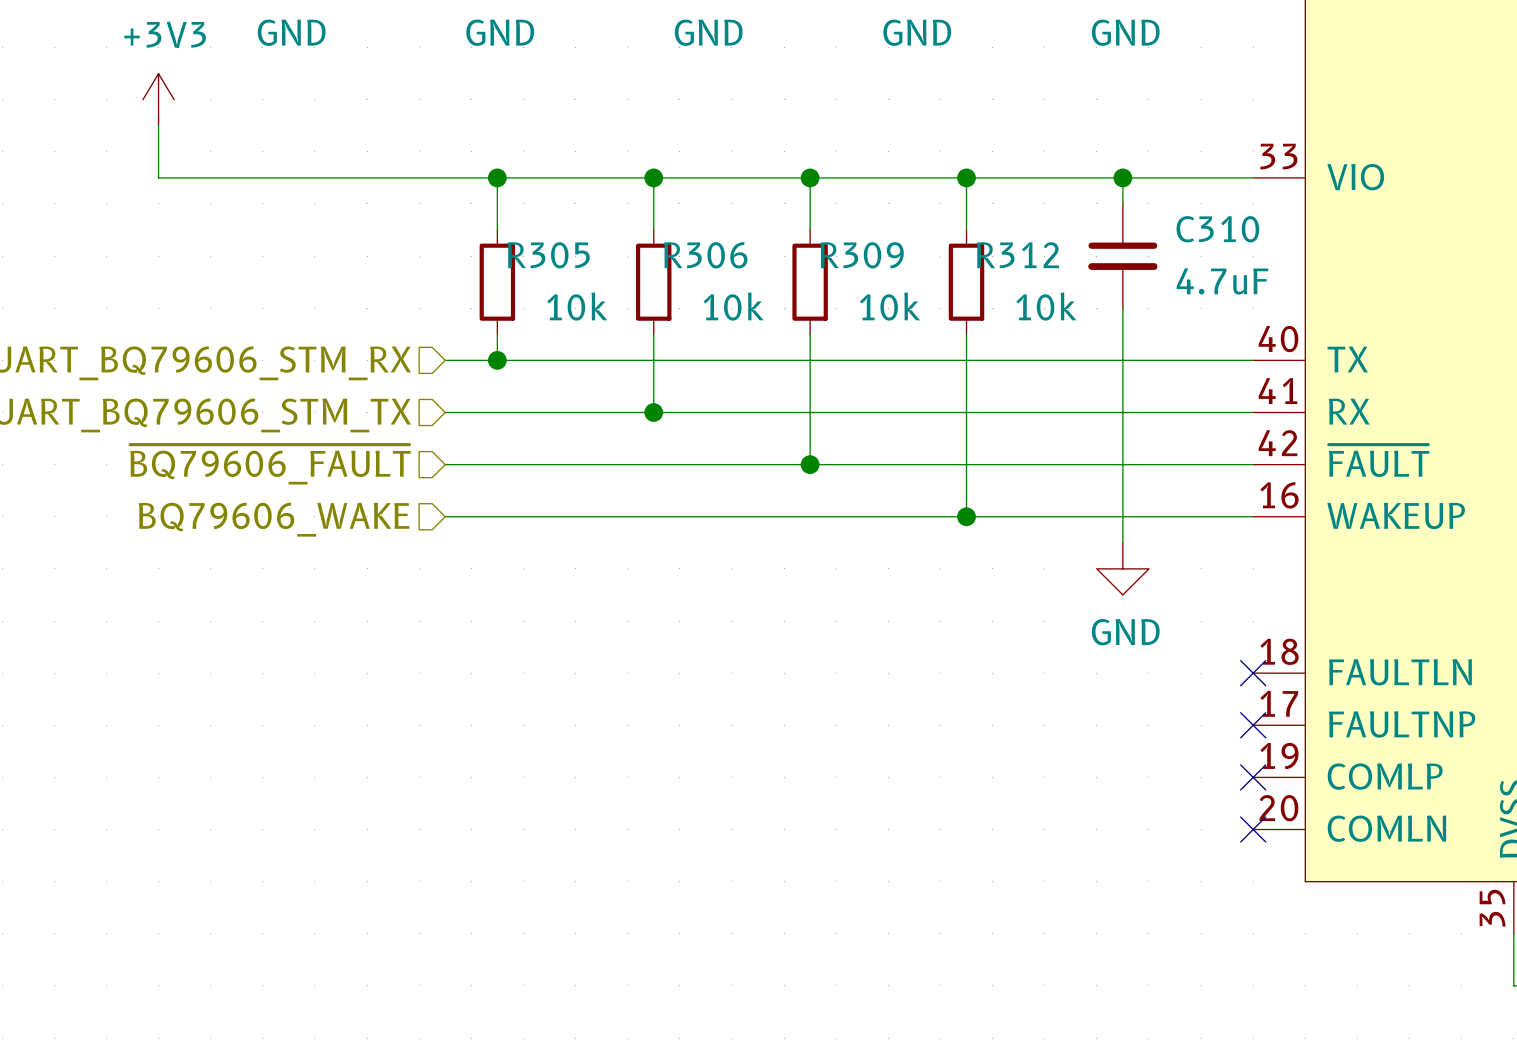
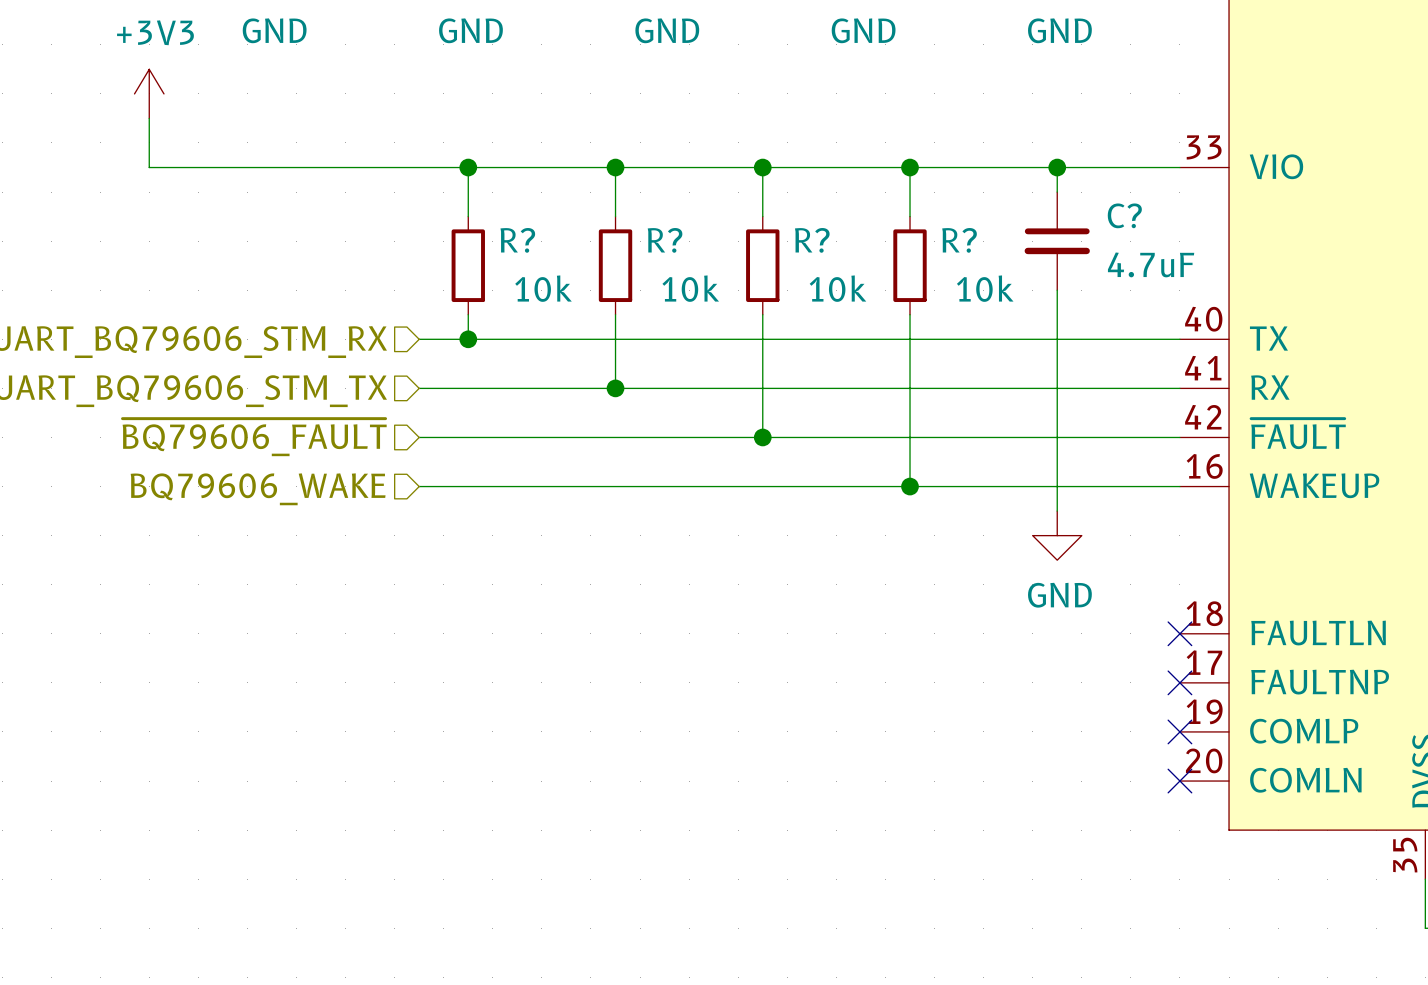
C310 name: C310 (1217, 229) -> C? (1124, 215)
R305 name: R305 (548, 255) -> R? (517, 240)
R306 name: R306 (705, 255) -> R? (665, 240)
R309 name: R309 (862, 255) -> R? (812, 240)
R312 name: R312 (1017, 255) -> R? (959, 240)

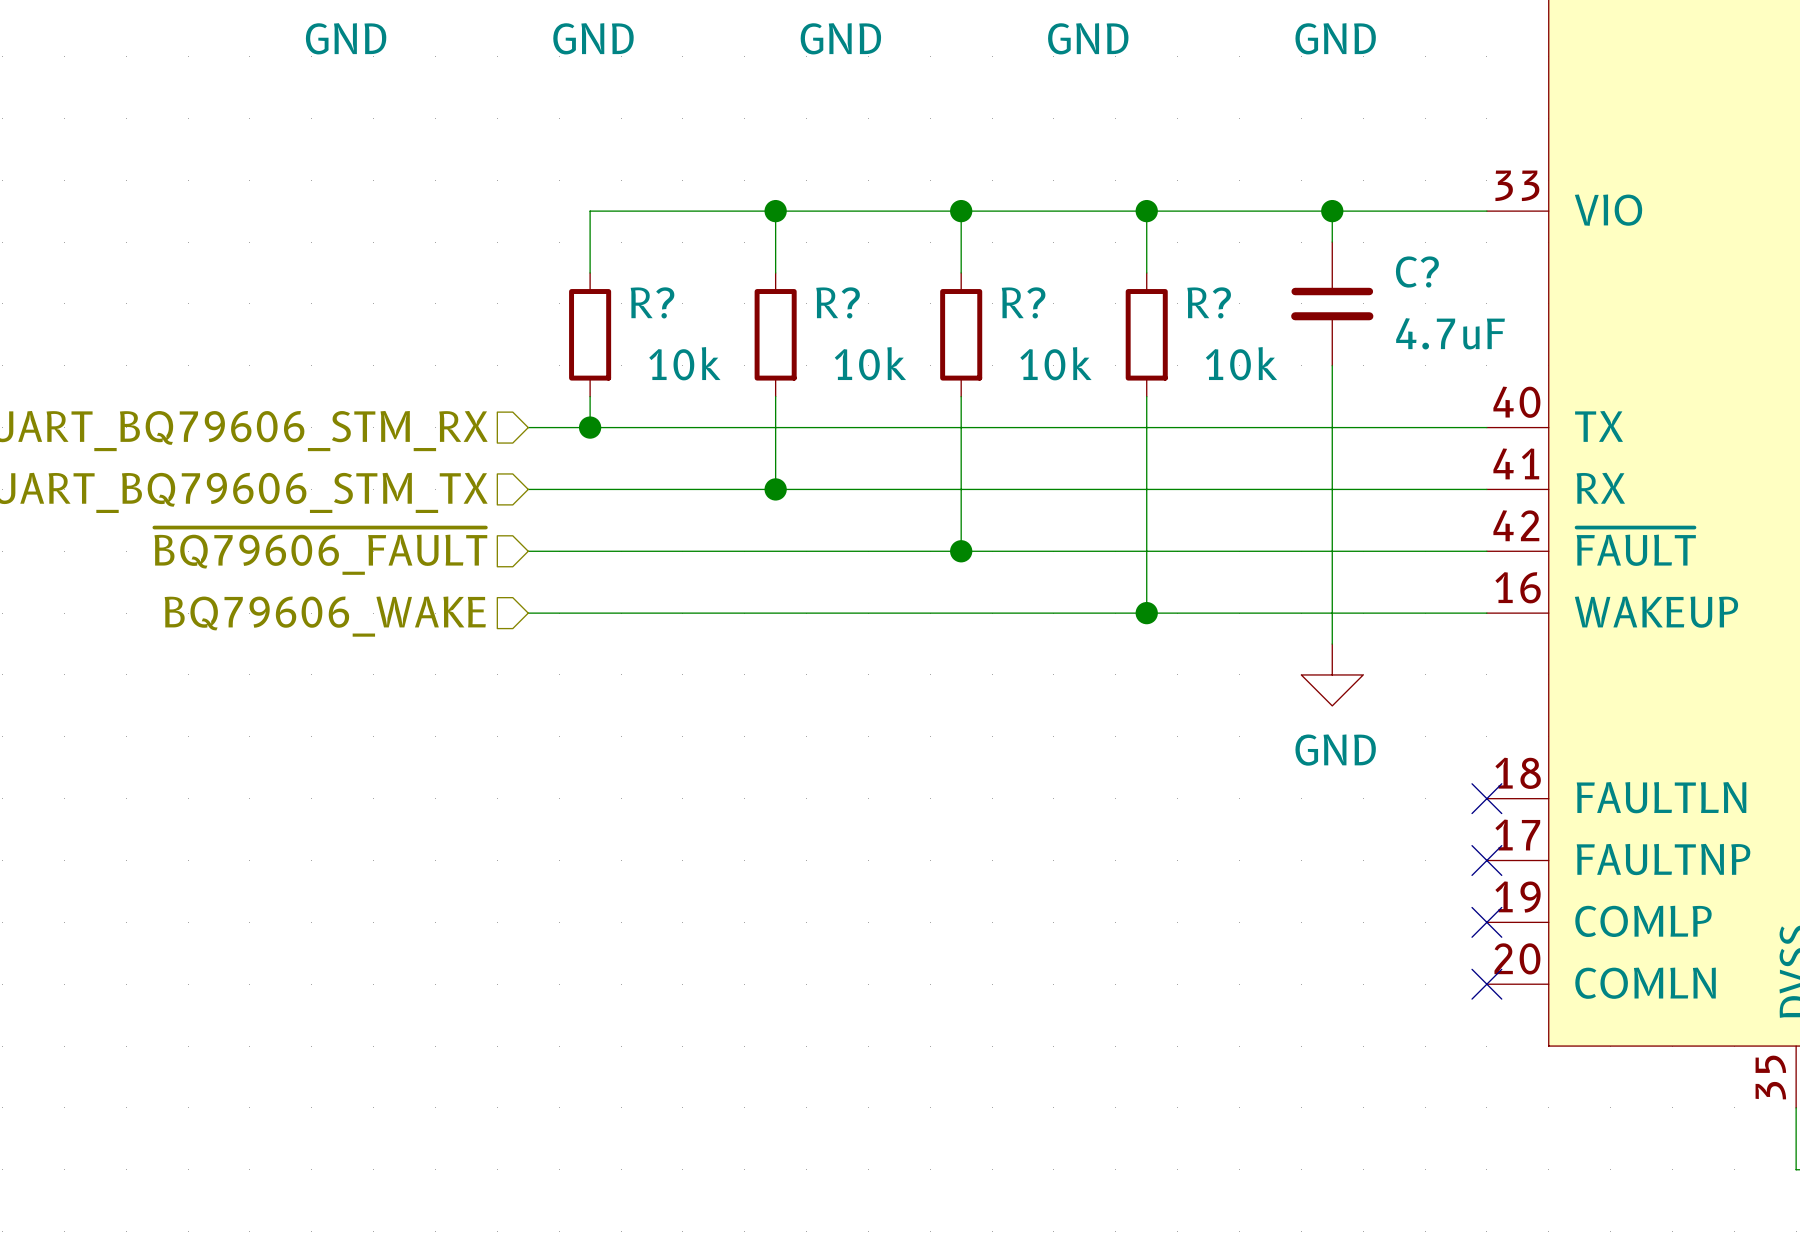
power symbol: +3V3 (149, 93) -> none
wire: (149, 118) (149, 167) (468, 167) -> none
junction: (468, 167) -> none

